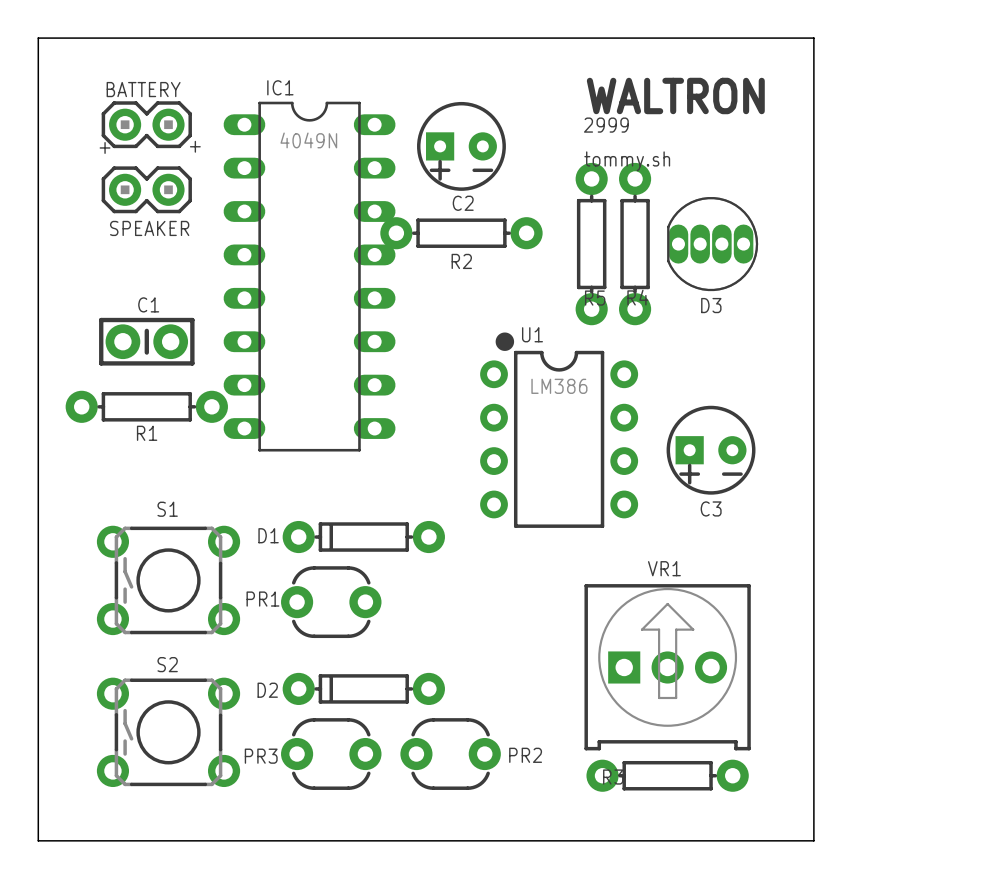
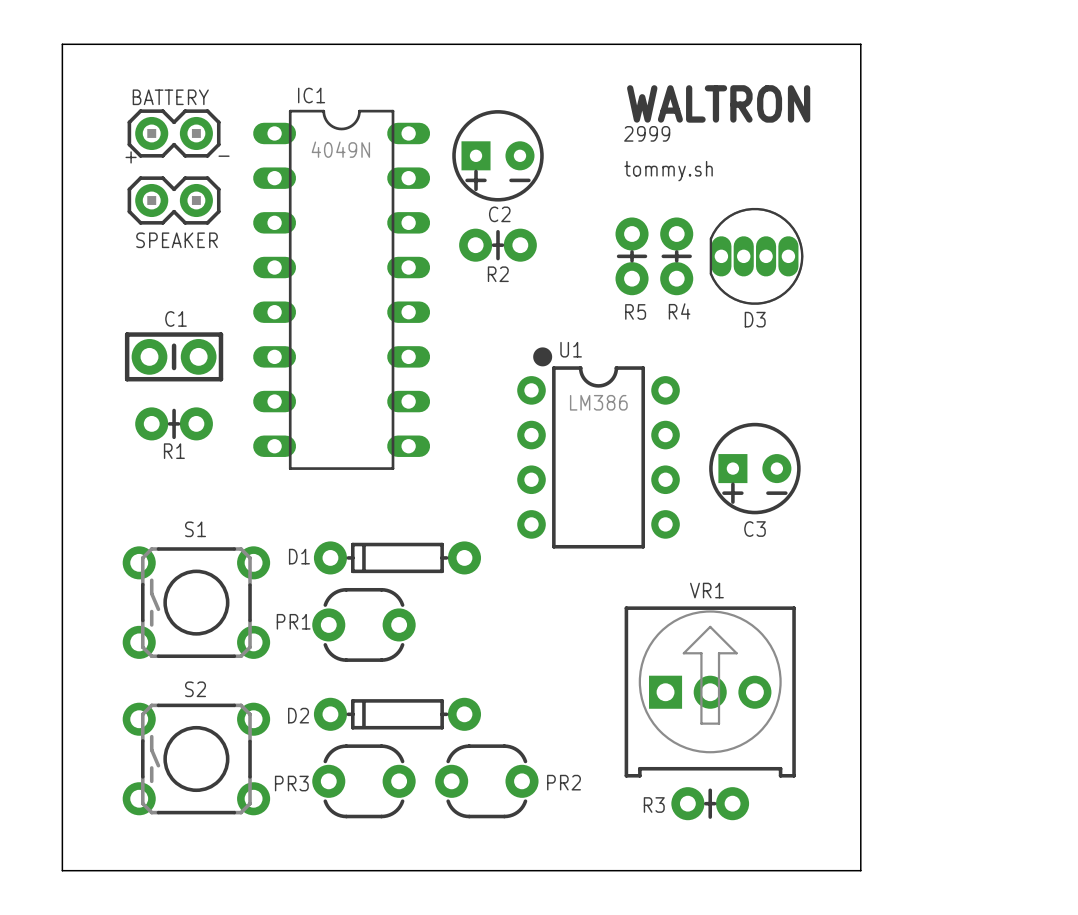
text: + (195, 146) -> - (224, 156)
R5 footprint: [575, 162, 608, 326] -> [615, 217, 649, 296]
R4 footprint: [619, 162, 652, 326] -> [660, 217, 694, 296]
R2 footprint: [380, 217, 543, 250] -> [459, 228, 537, 262]
R1 footprint: [65, 390, 228, 423] -> [135, 407, 213, 441]
R3 footprint: [586, 759, 749, 792] -> [671, 787, 750, 821]

